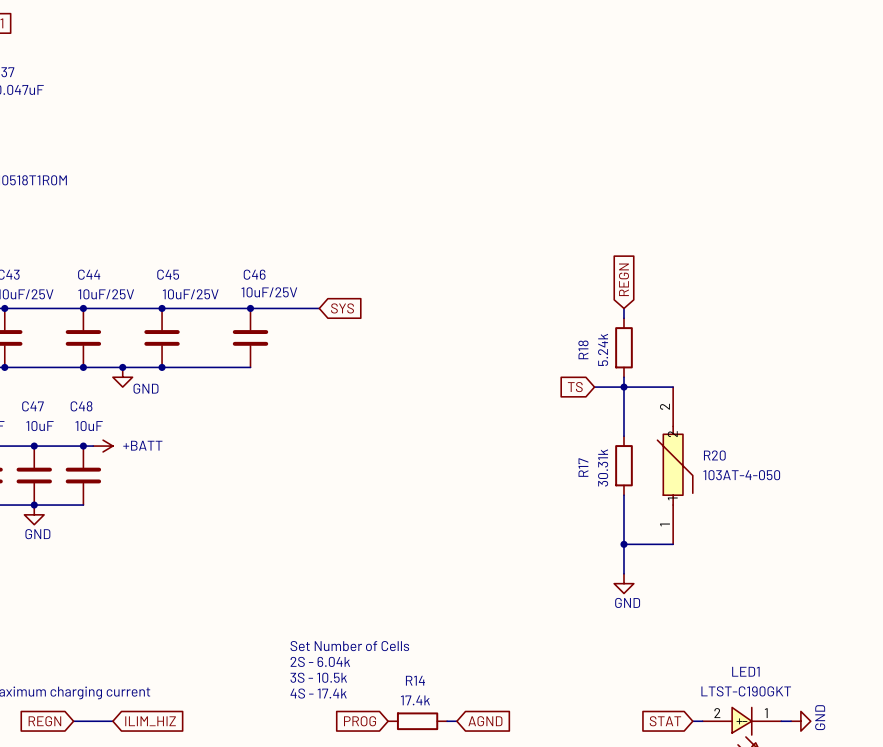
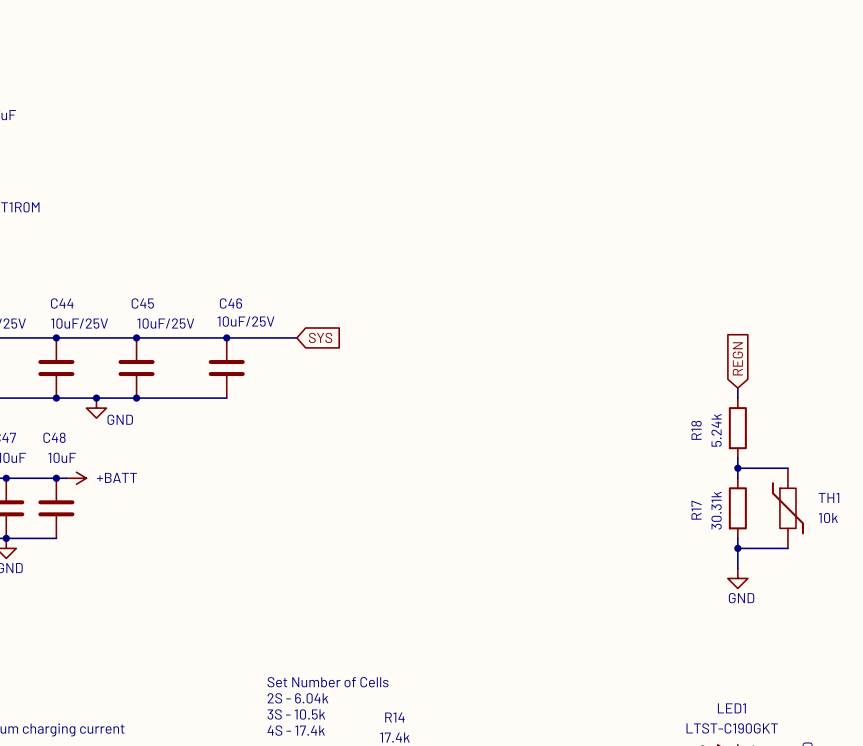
global label position: REGN (623, 279) -> REGN (737, 358)
wire: (623, 308) (623, 318) -> (737, 388) (737, 398)
R18 position: (623, 347) -> (737, 428)
wire: (623, 377) (623, 436) -> none
global label: TS (575, 387) -> none
wire: (594, 387) (673, 387) -> none
junction: (623, 387) -> none
wire: none -> (737, 458) (737, 478)
wire: none -> (737, 468) (787, 468)
junction: none -> (737, 468)
R17 position: (623, 465) -> (737, 508)
R20: 103AT-4-050 (675, 465) -> none
TH1: none -> 10k (787, 508)
wire: (623, 495) (623, 573) -> none
wire: none -> (737, 538) (737, 568)
junction: none -> (737, 548)
wire: (623, 544) (673, 544) -> (737, 548) (787, 548)
junction: (623, 544) -> none
power symbol position: GND (623, 583) -> GND (737, 578)

